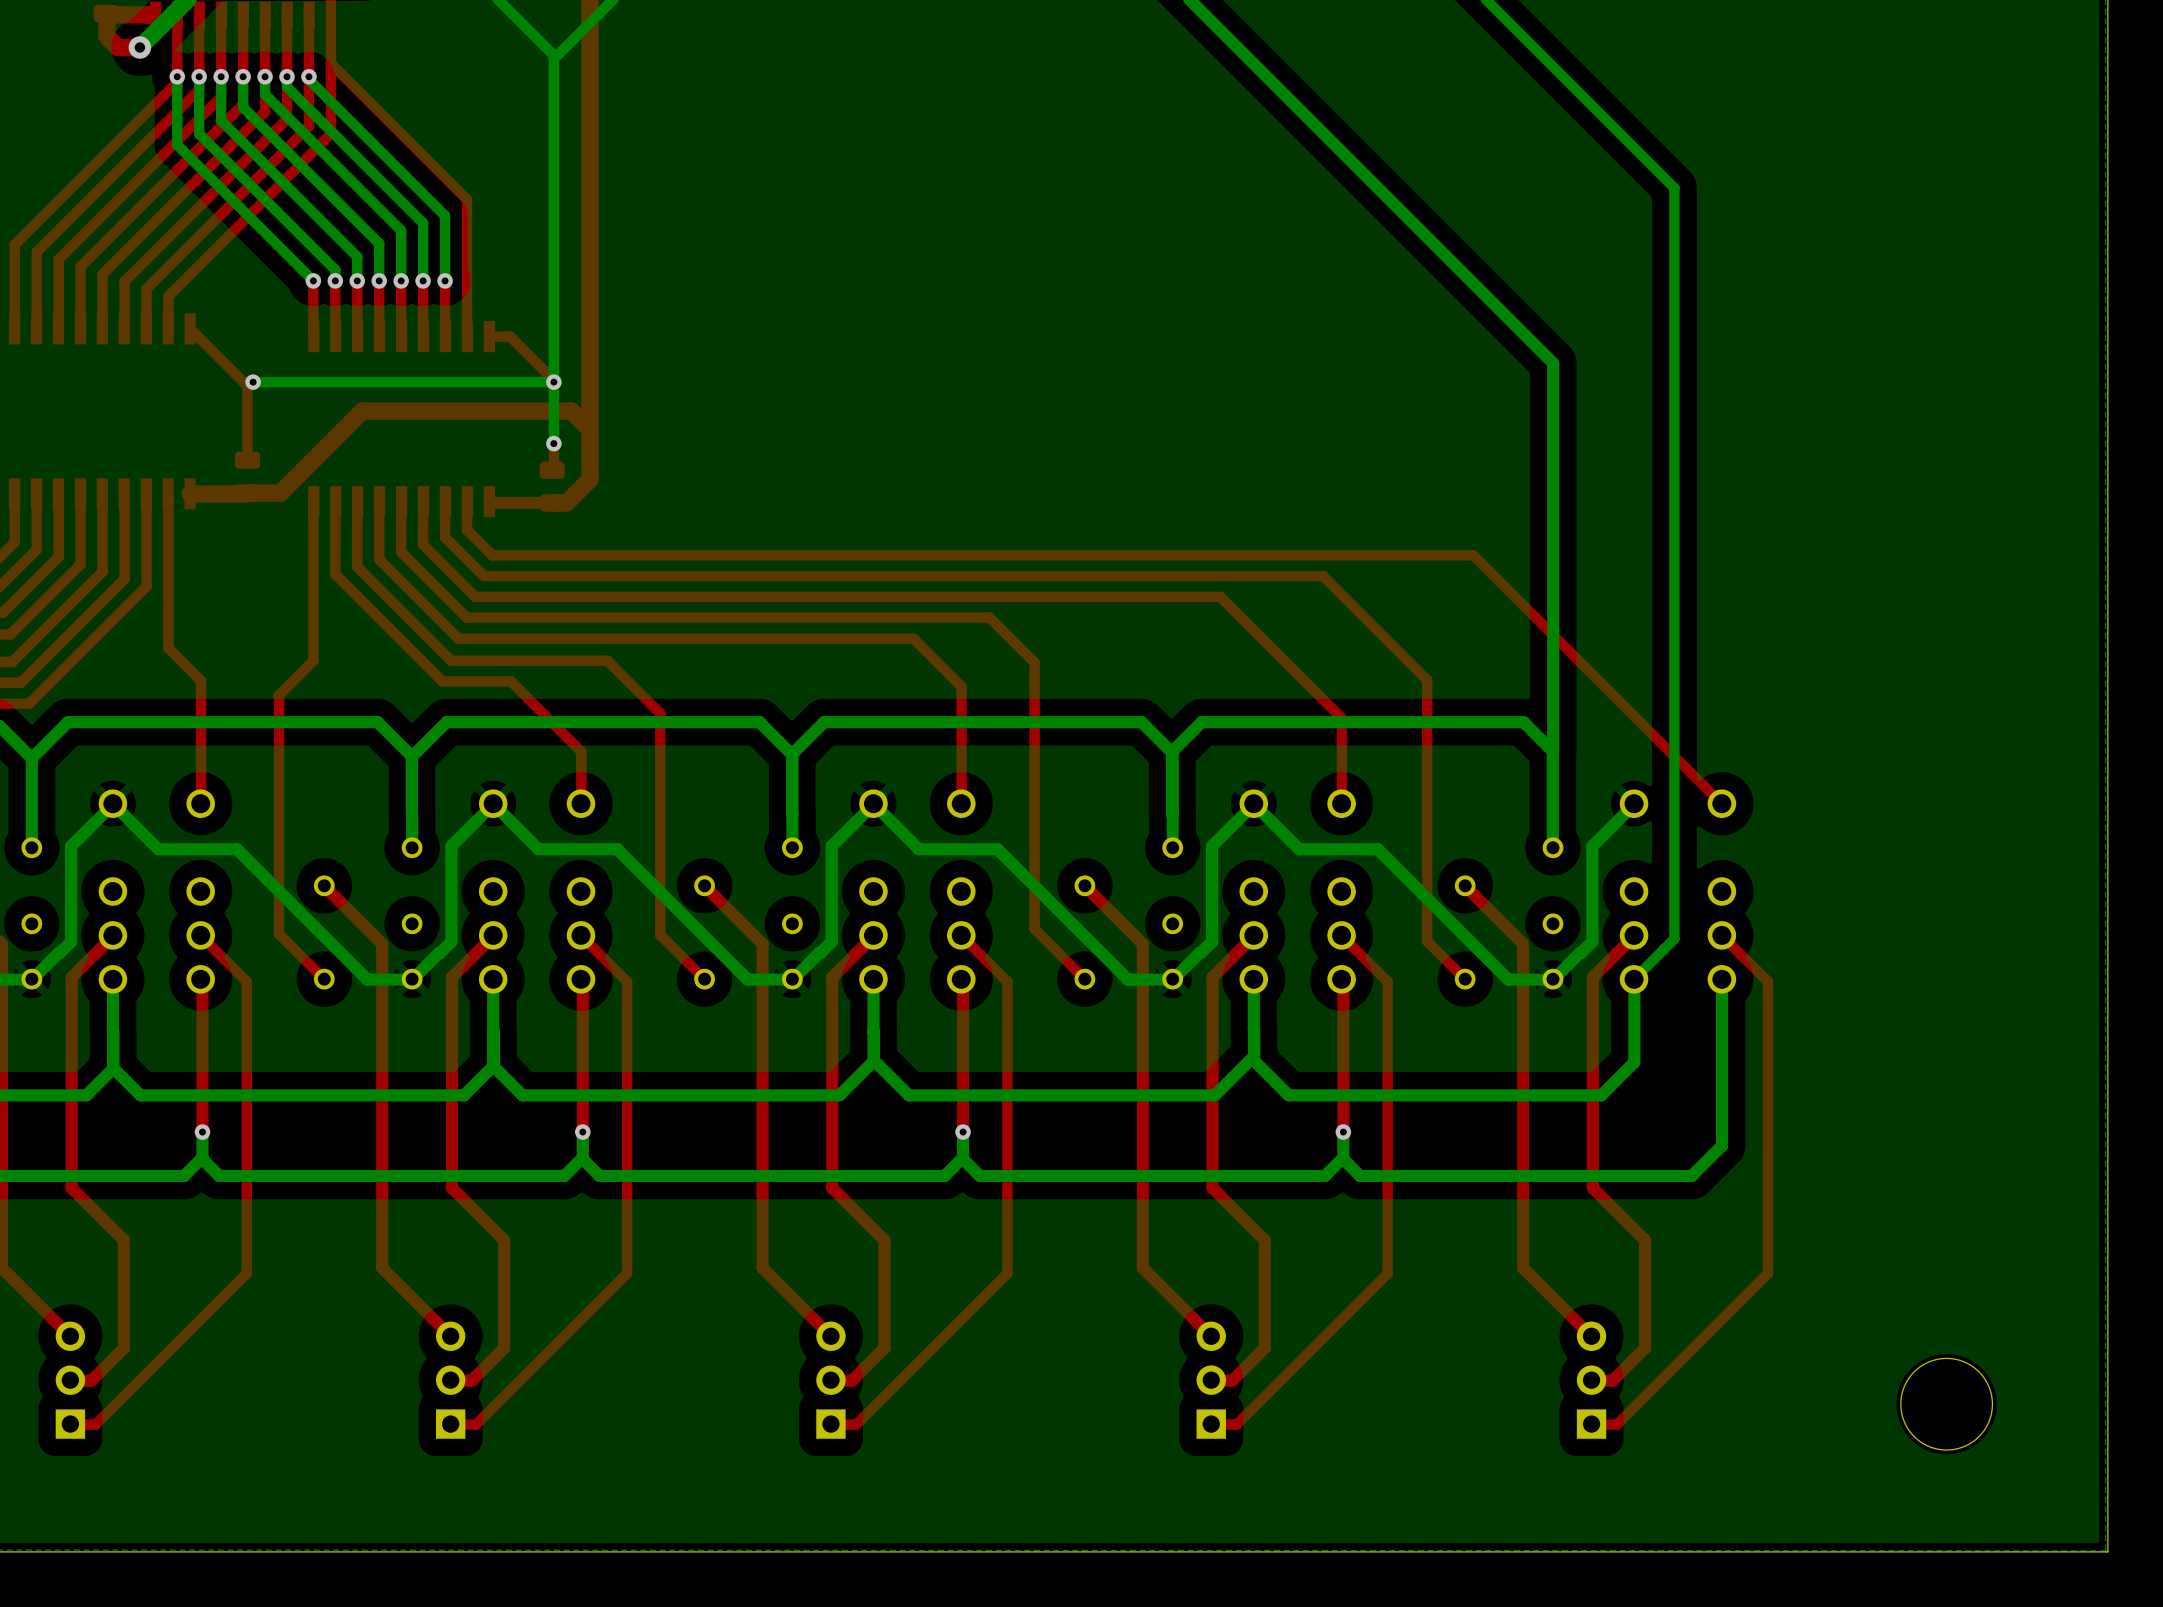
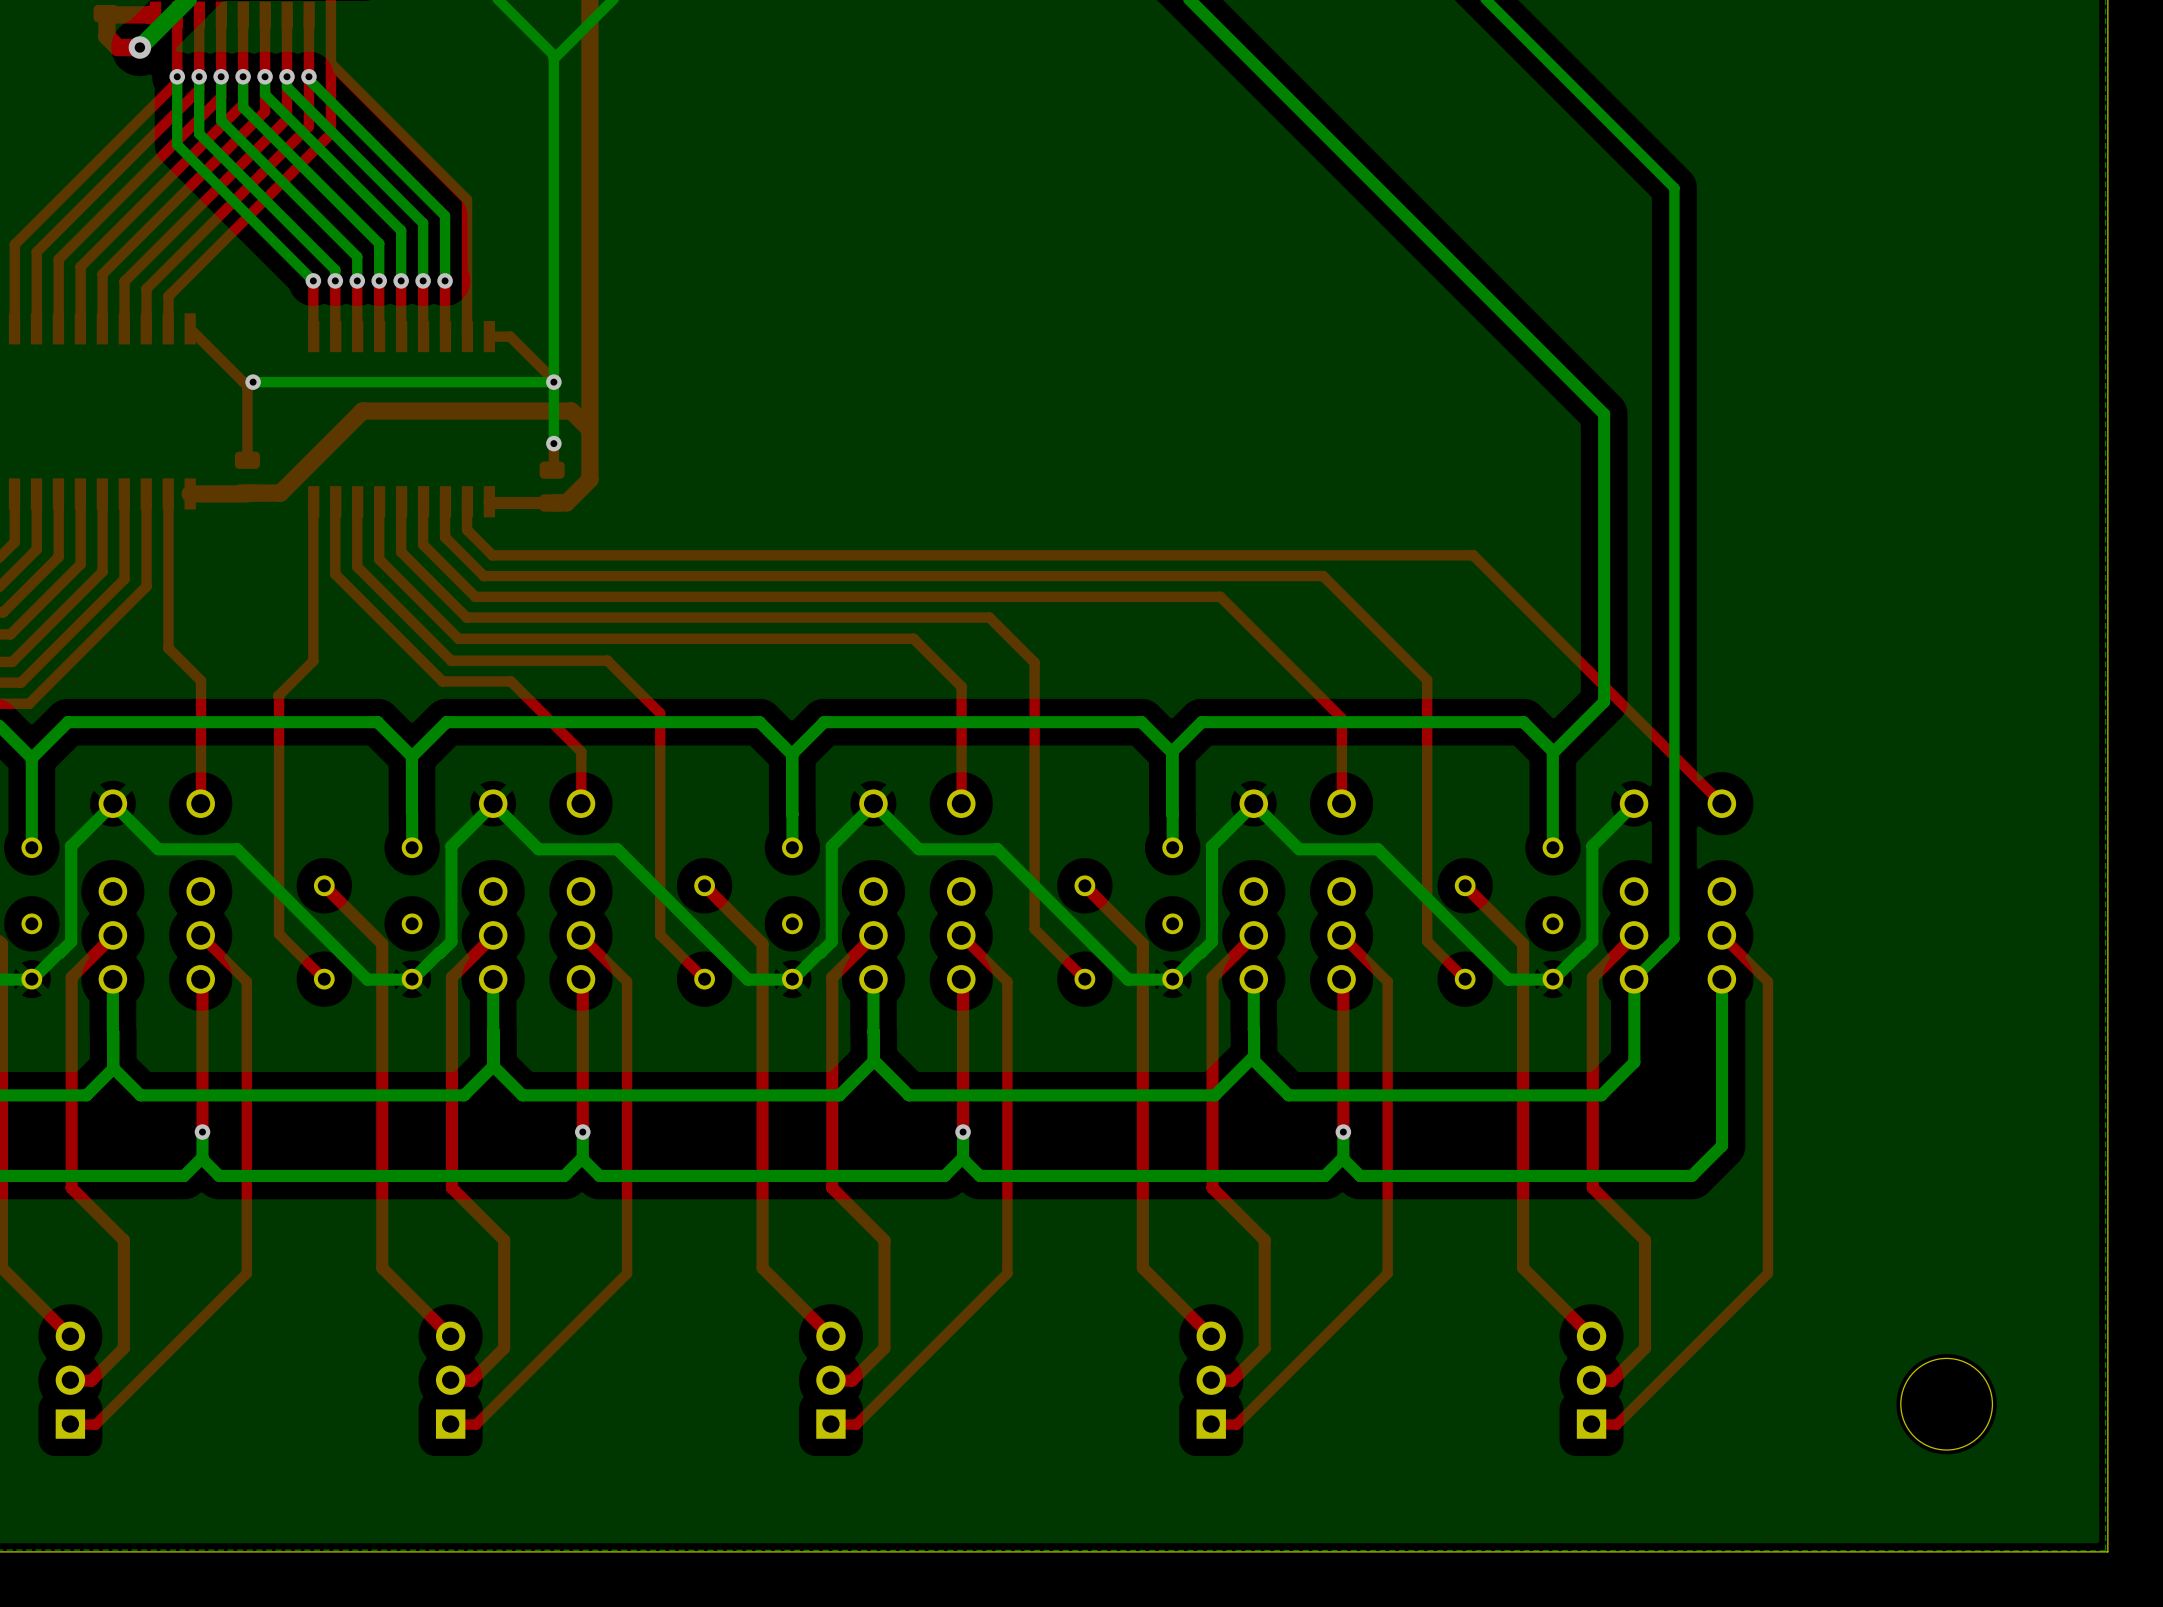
bottom track: (1553, 363) (1552, 751) -> (1553, 363) (1604, 414) (1604, 701) (1552, 751)

